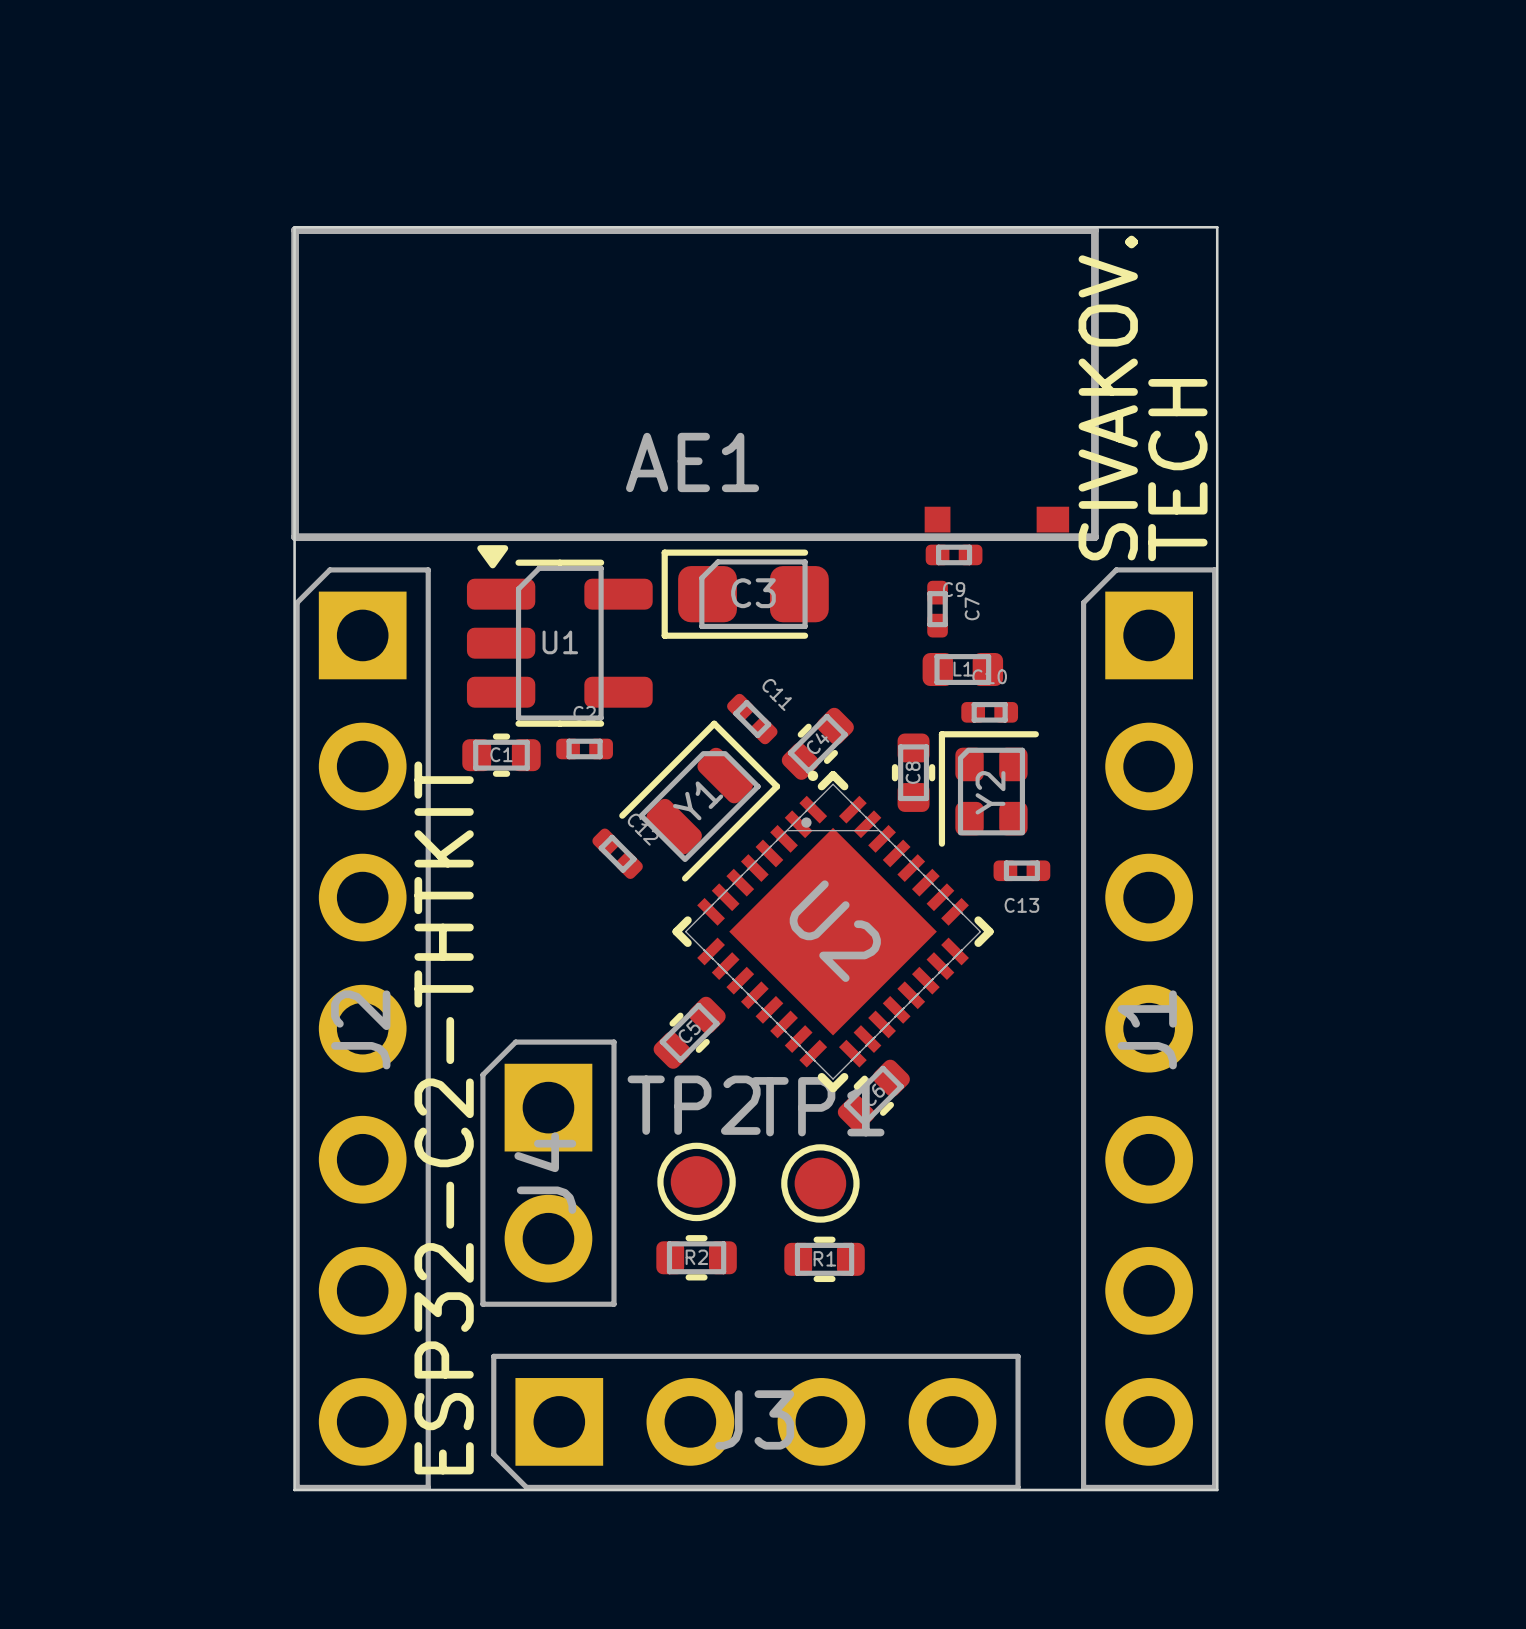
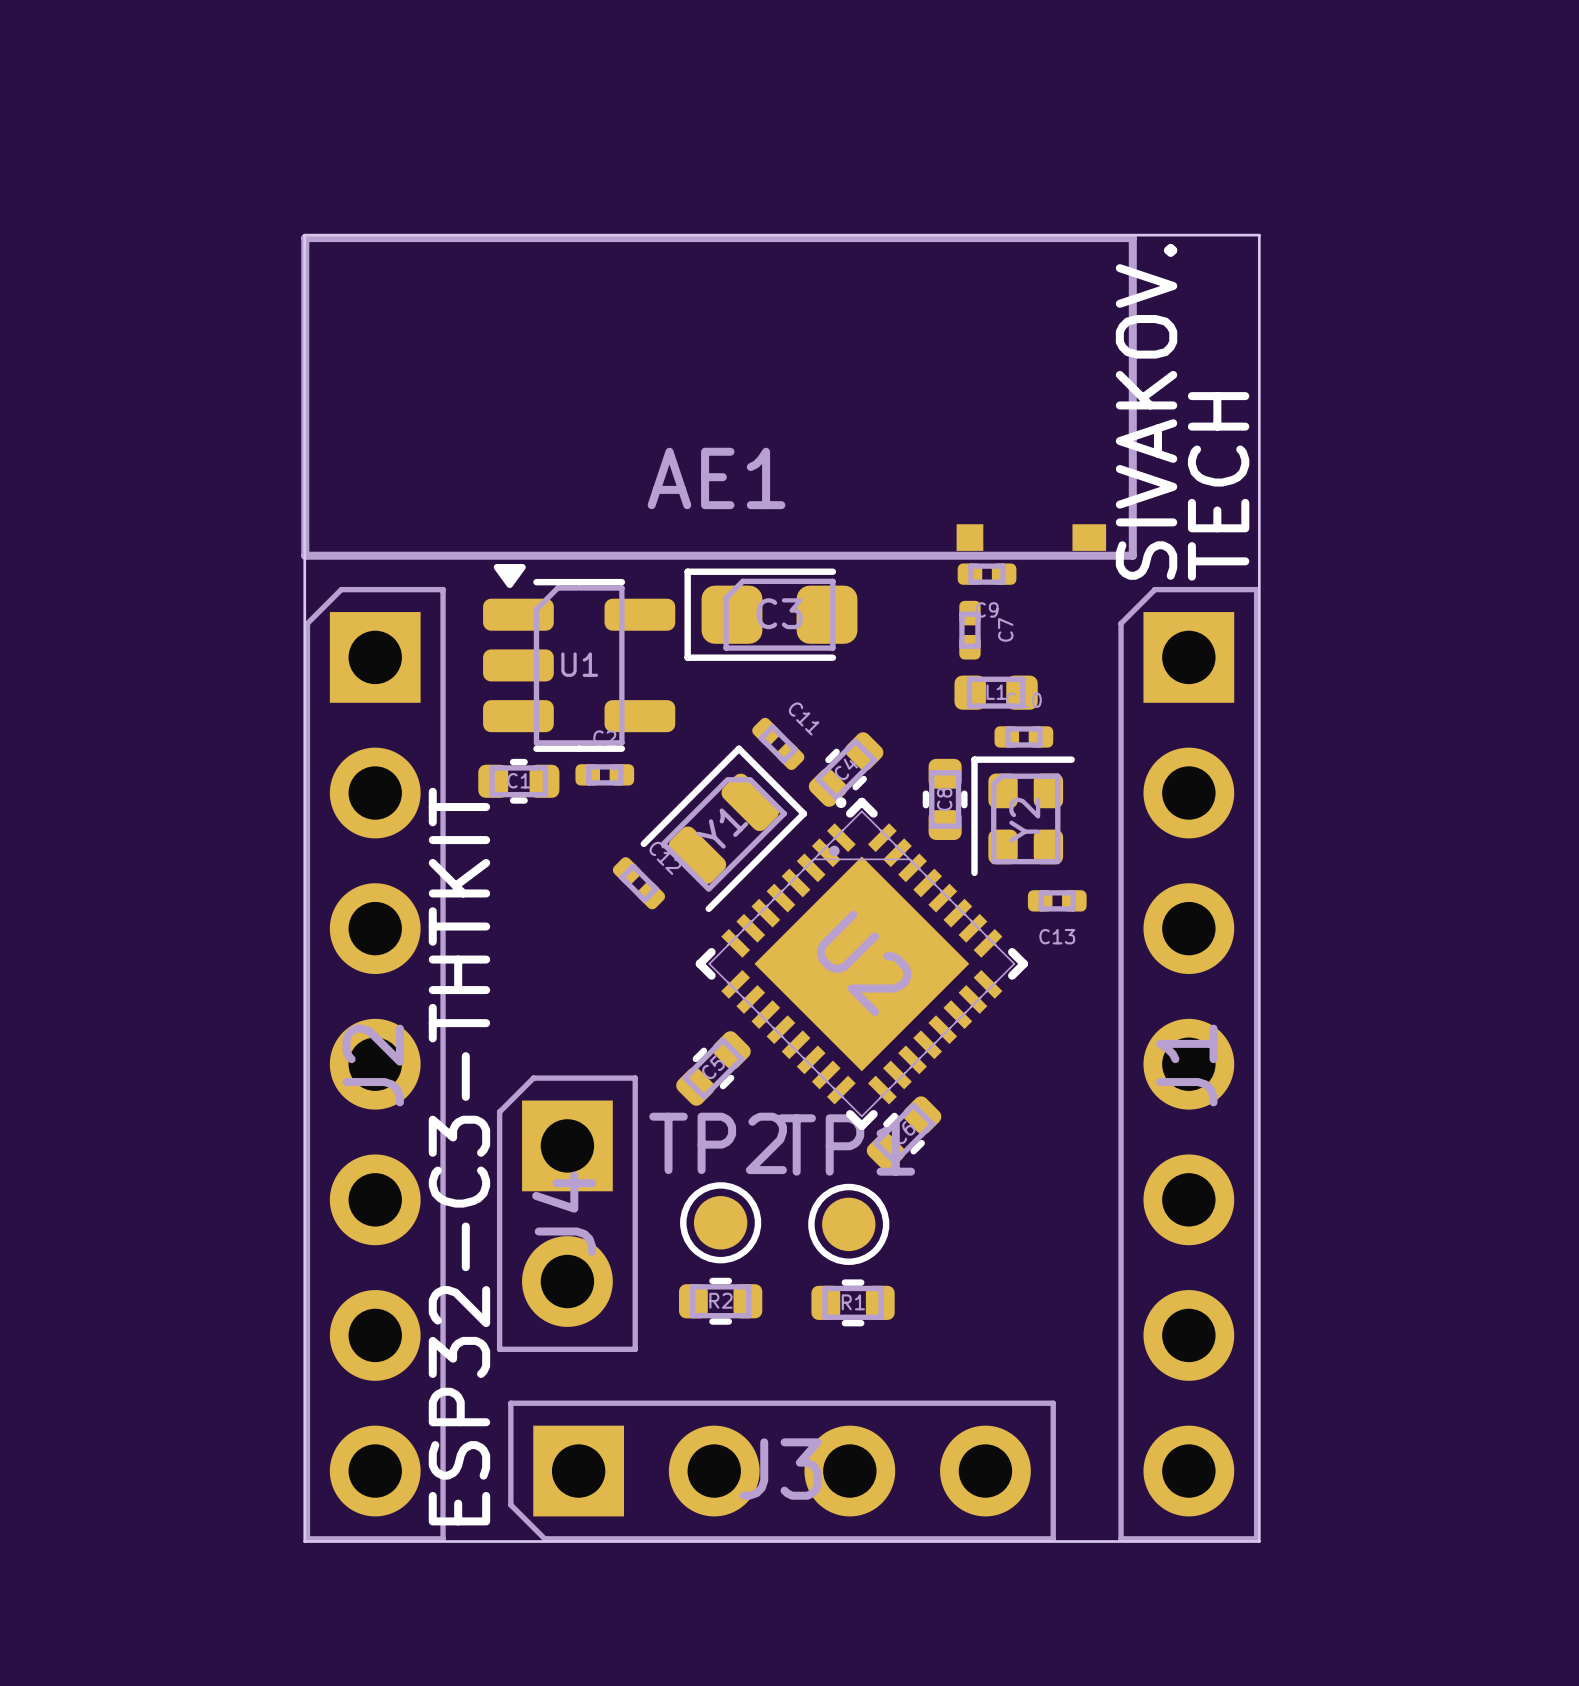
text: ESP32-C2-THTKIT (444, 1117) -> ESP32-C3-THTKIT (459, 1156)

